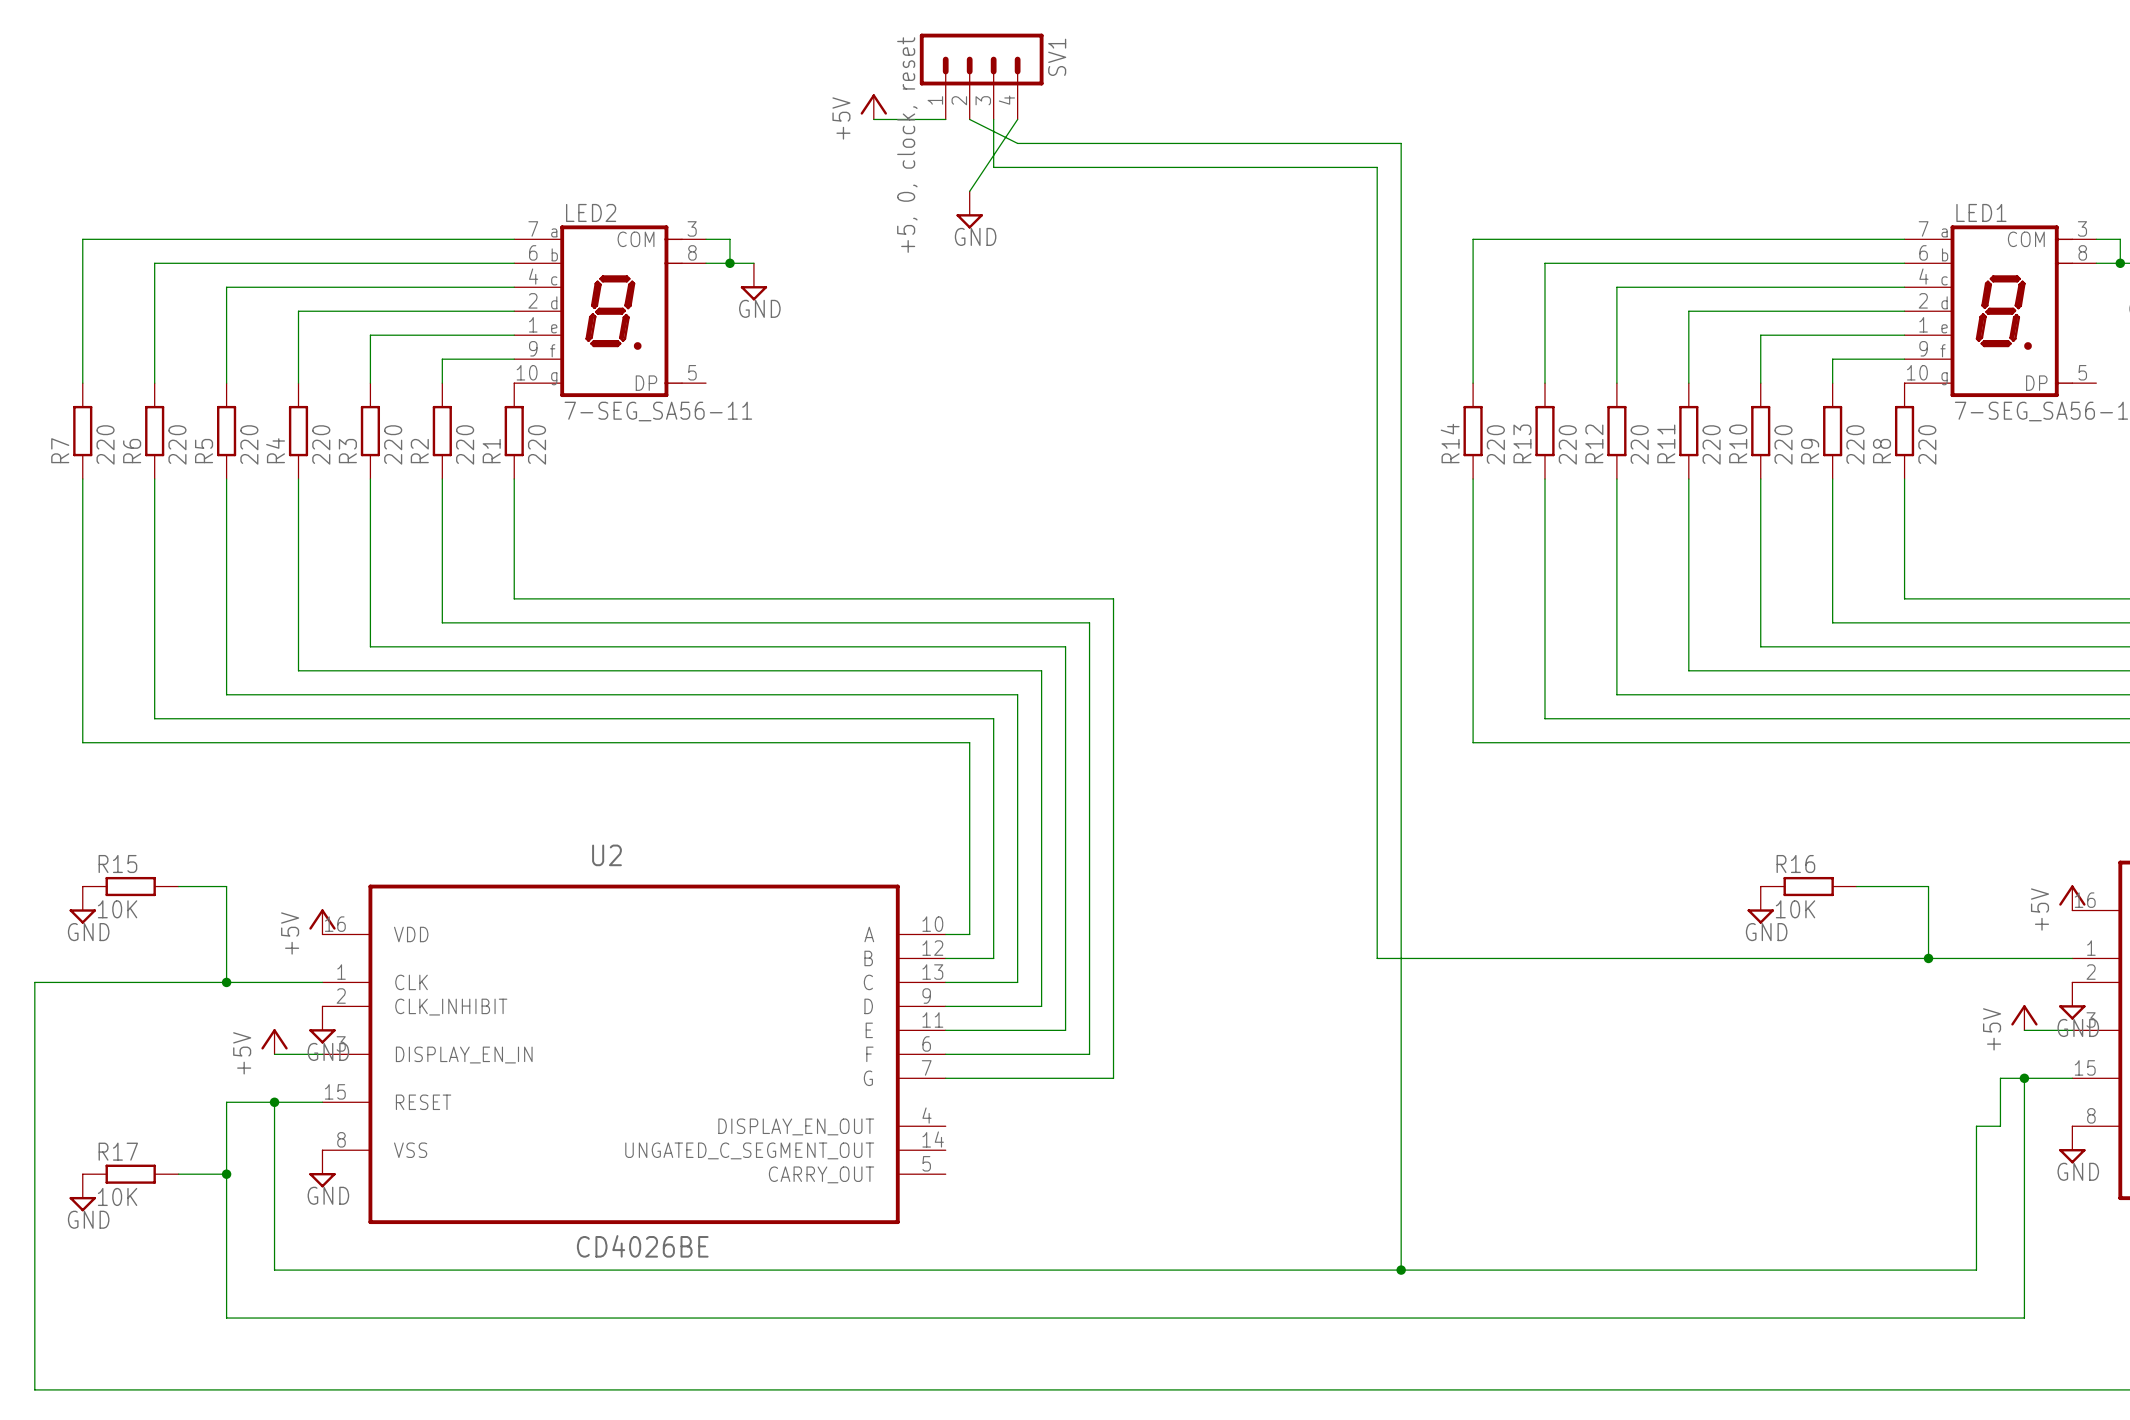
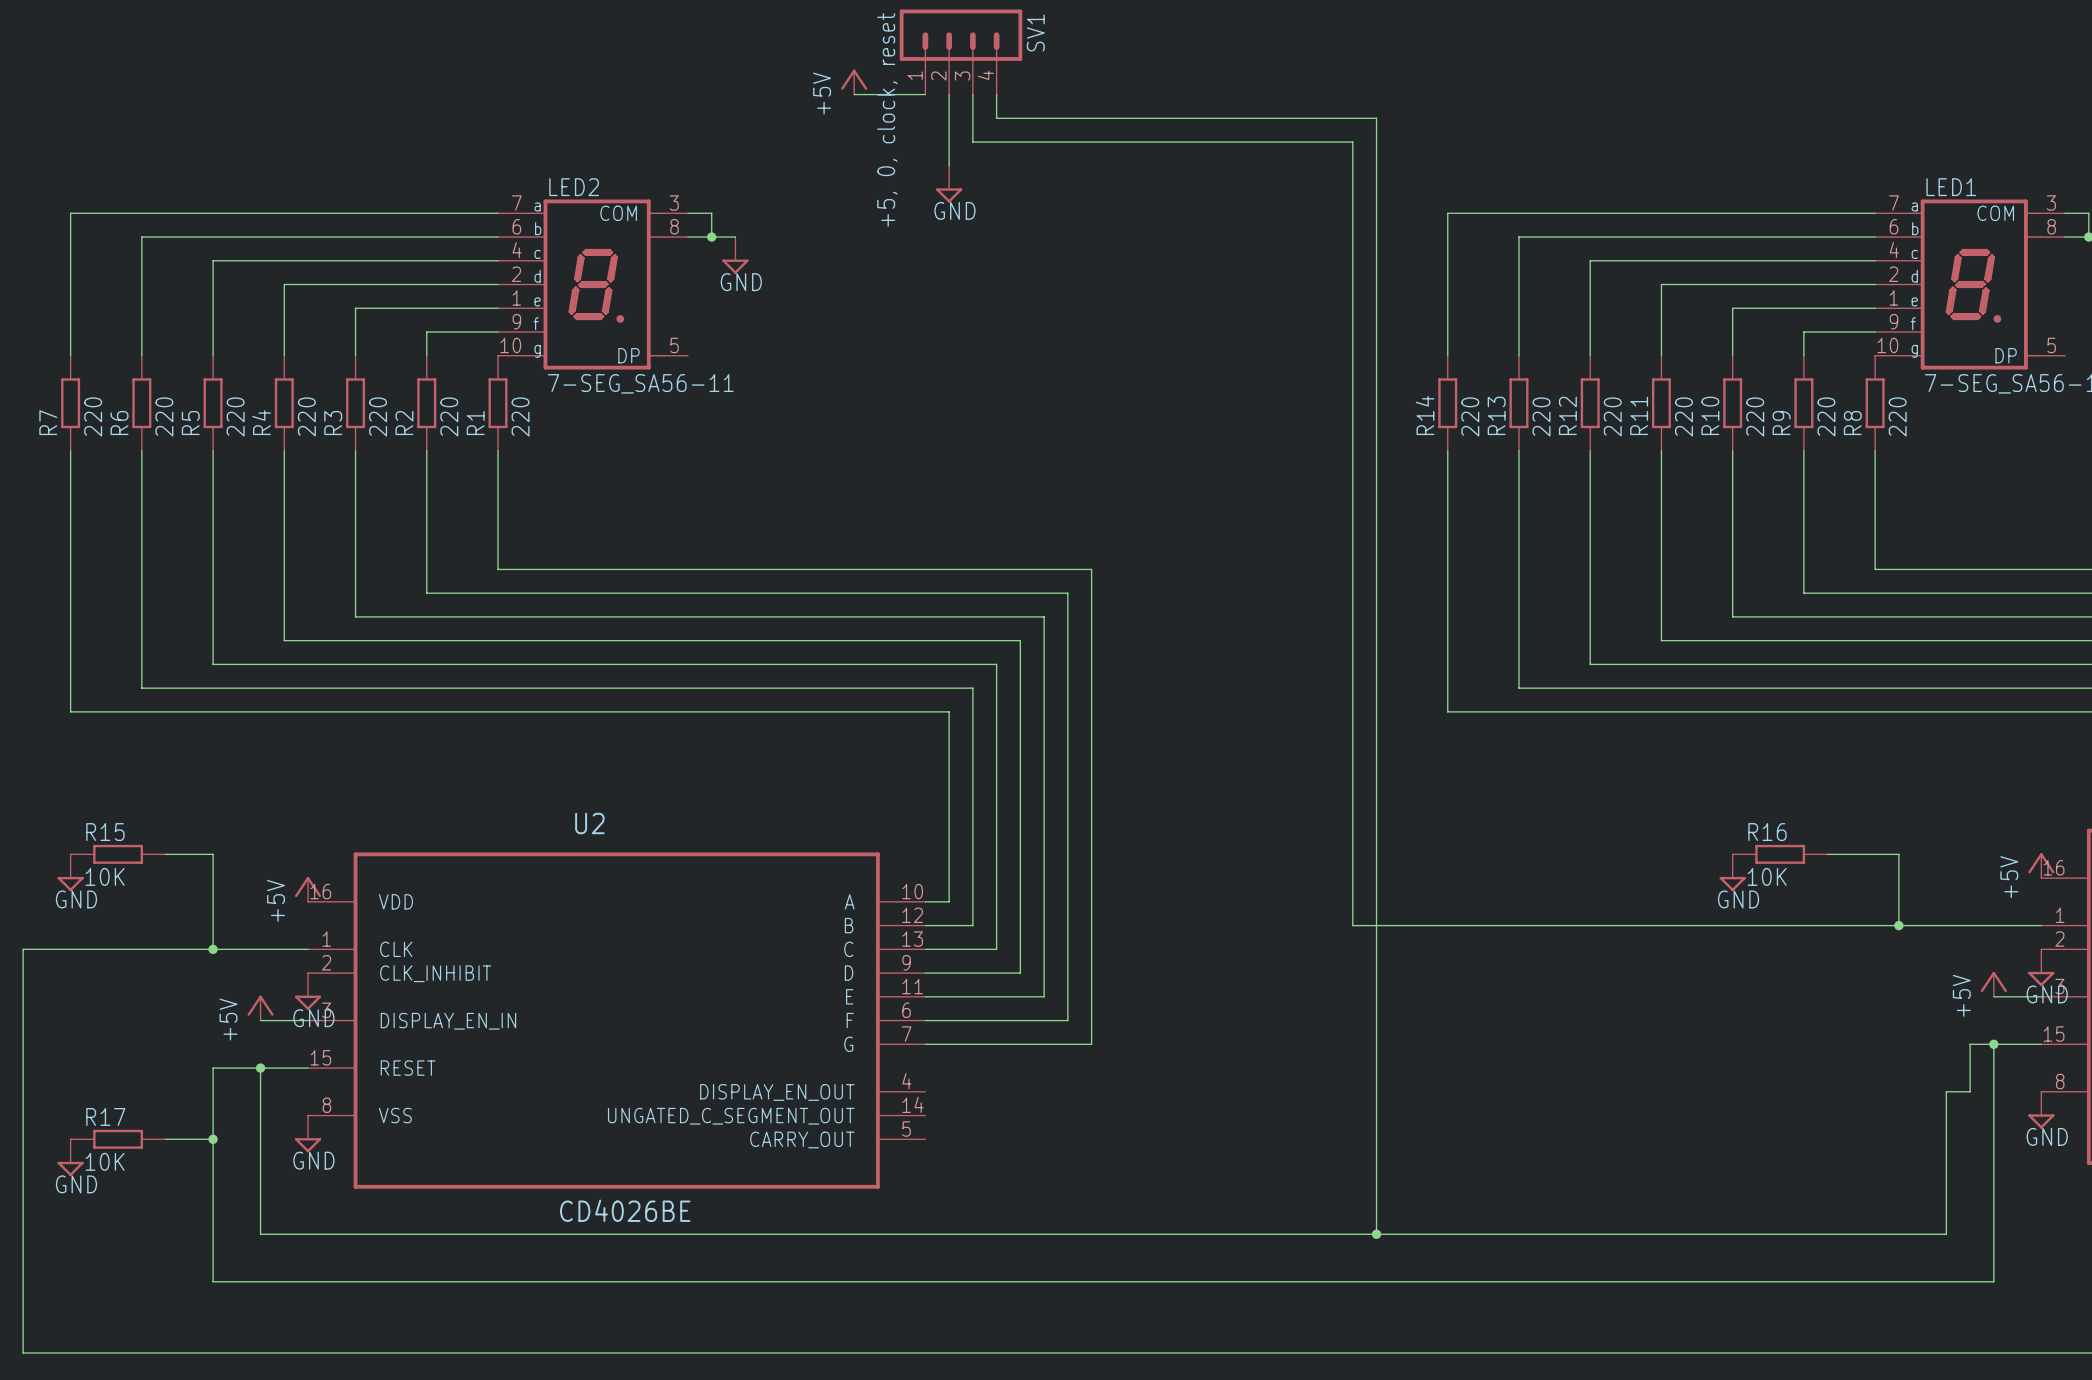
wire: (969, 119) (1017, 143) -> (996, 94) (996, 118)
wire: (1017, 119) (969, 191) -> (949, 94) (949, 165)

